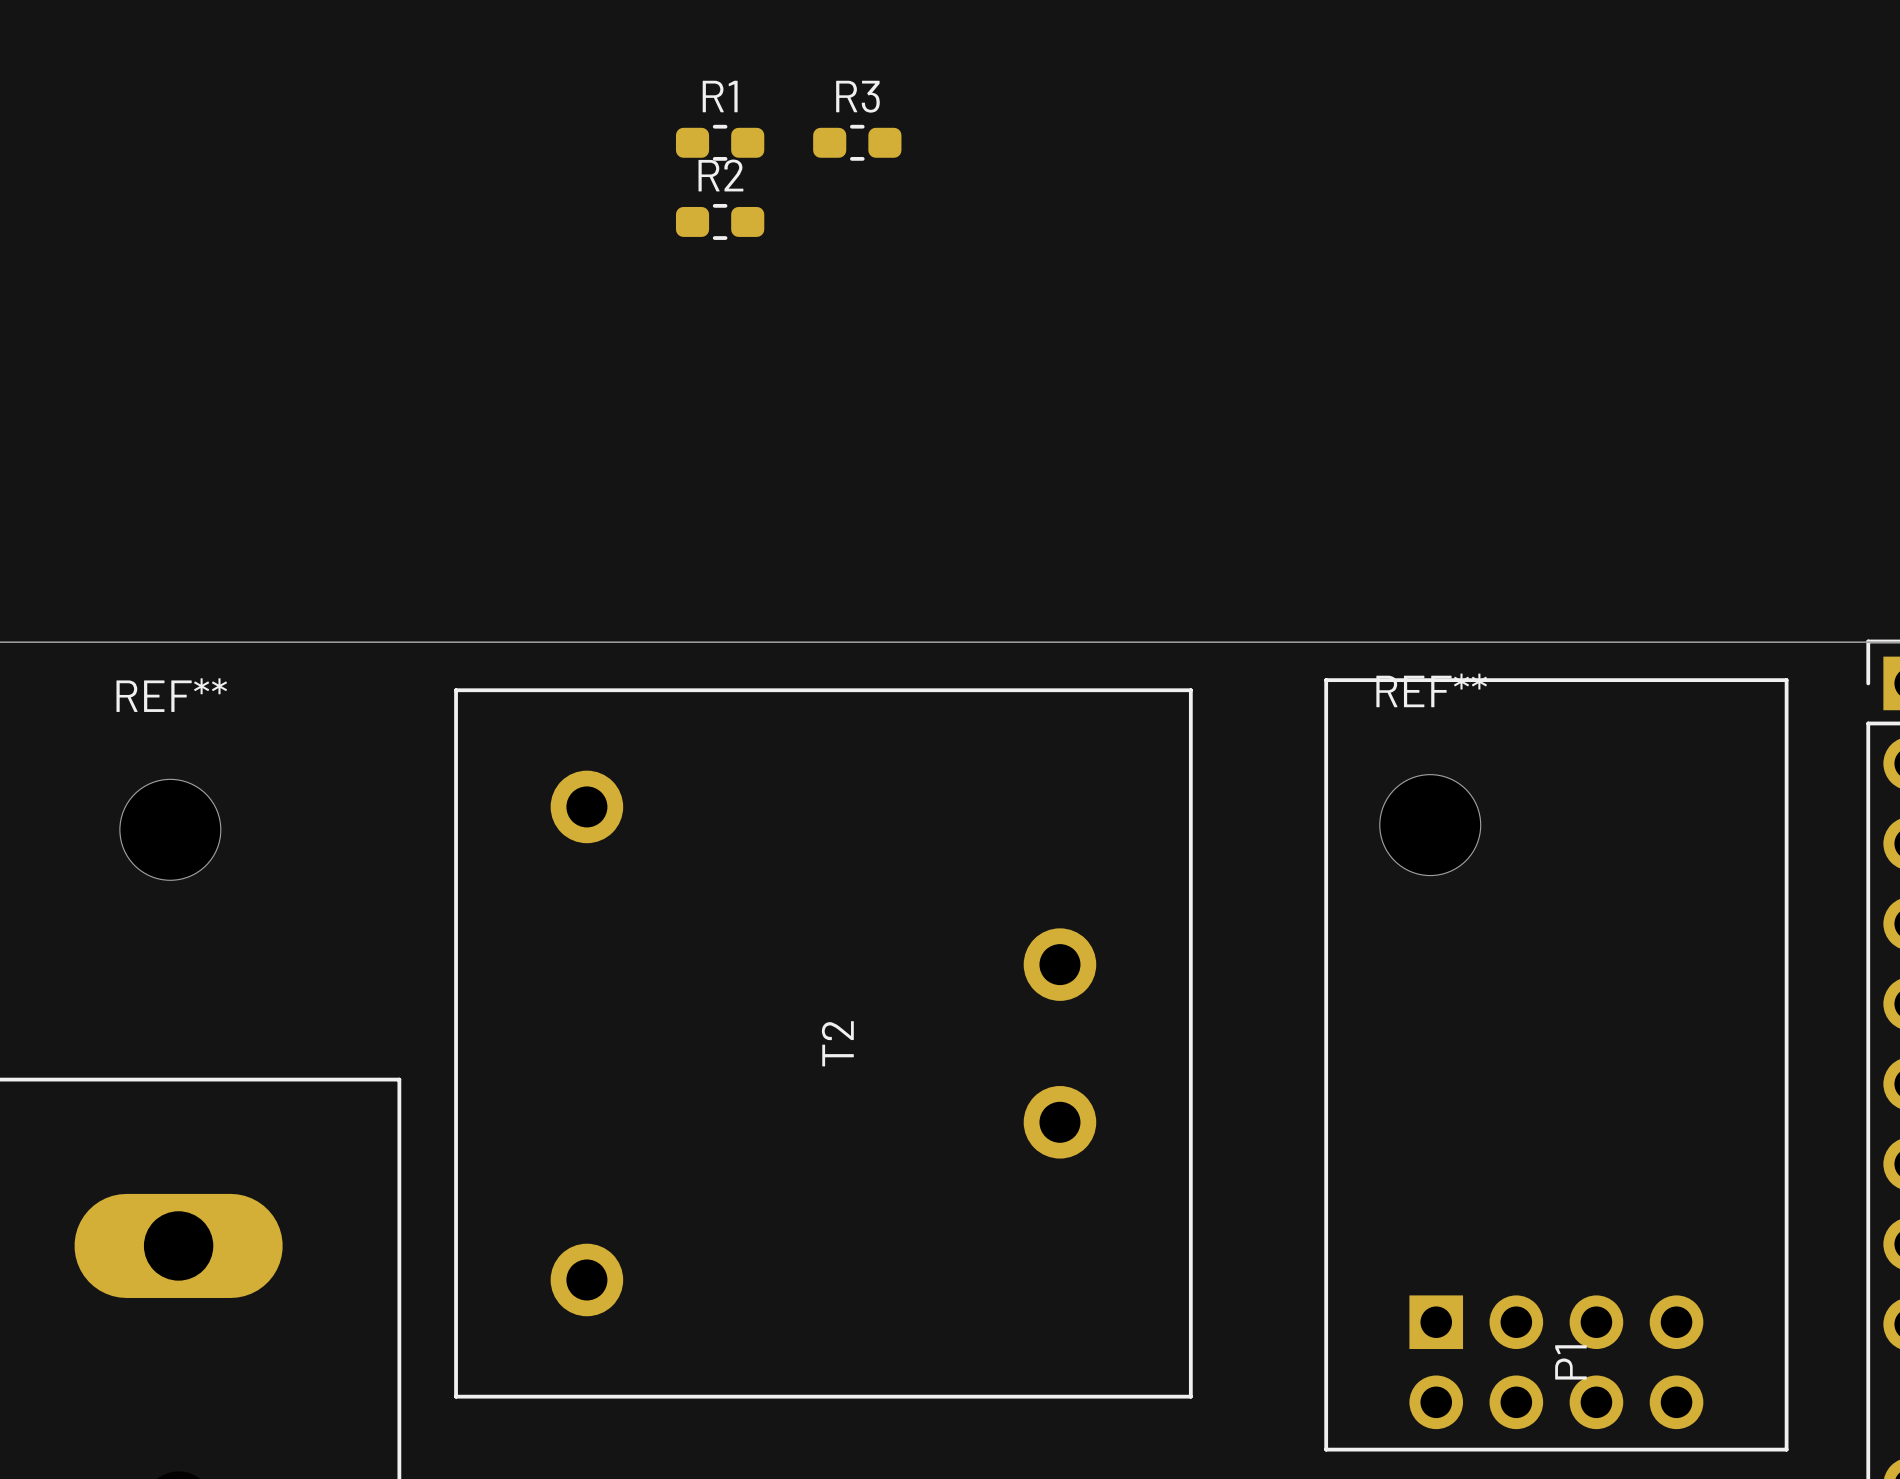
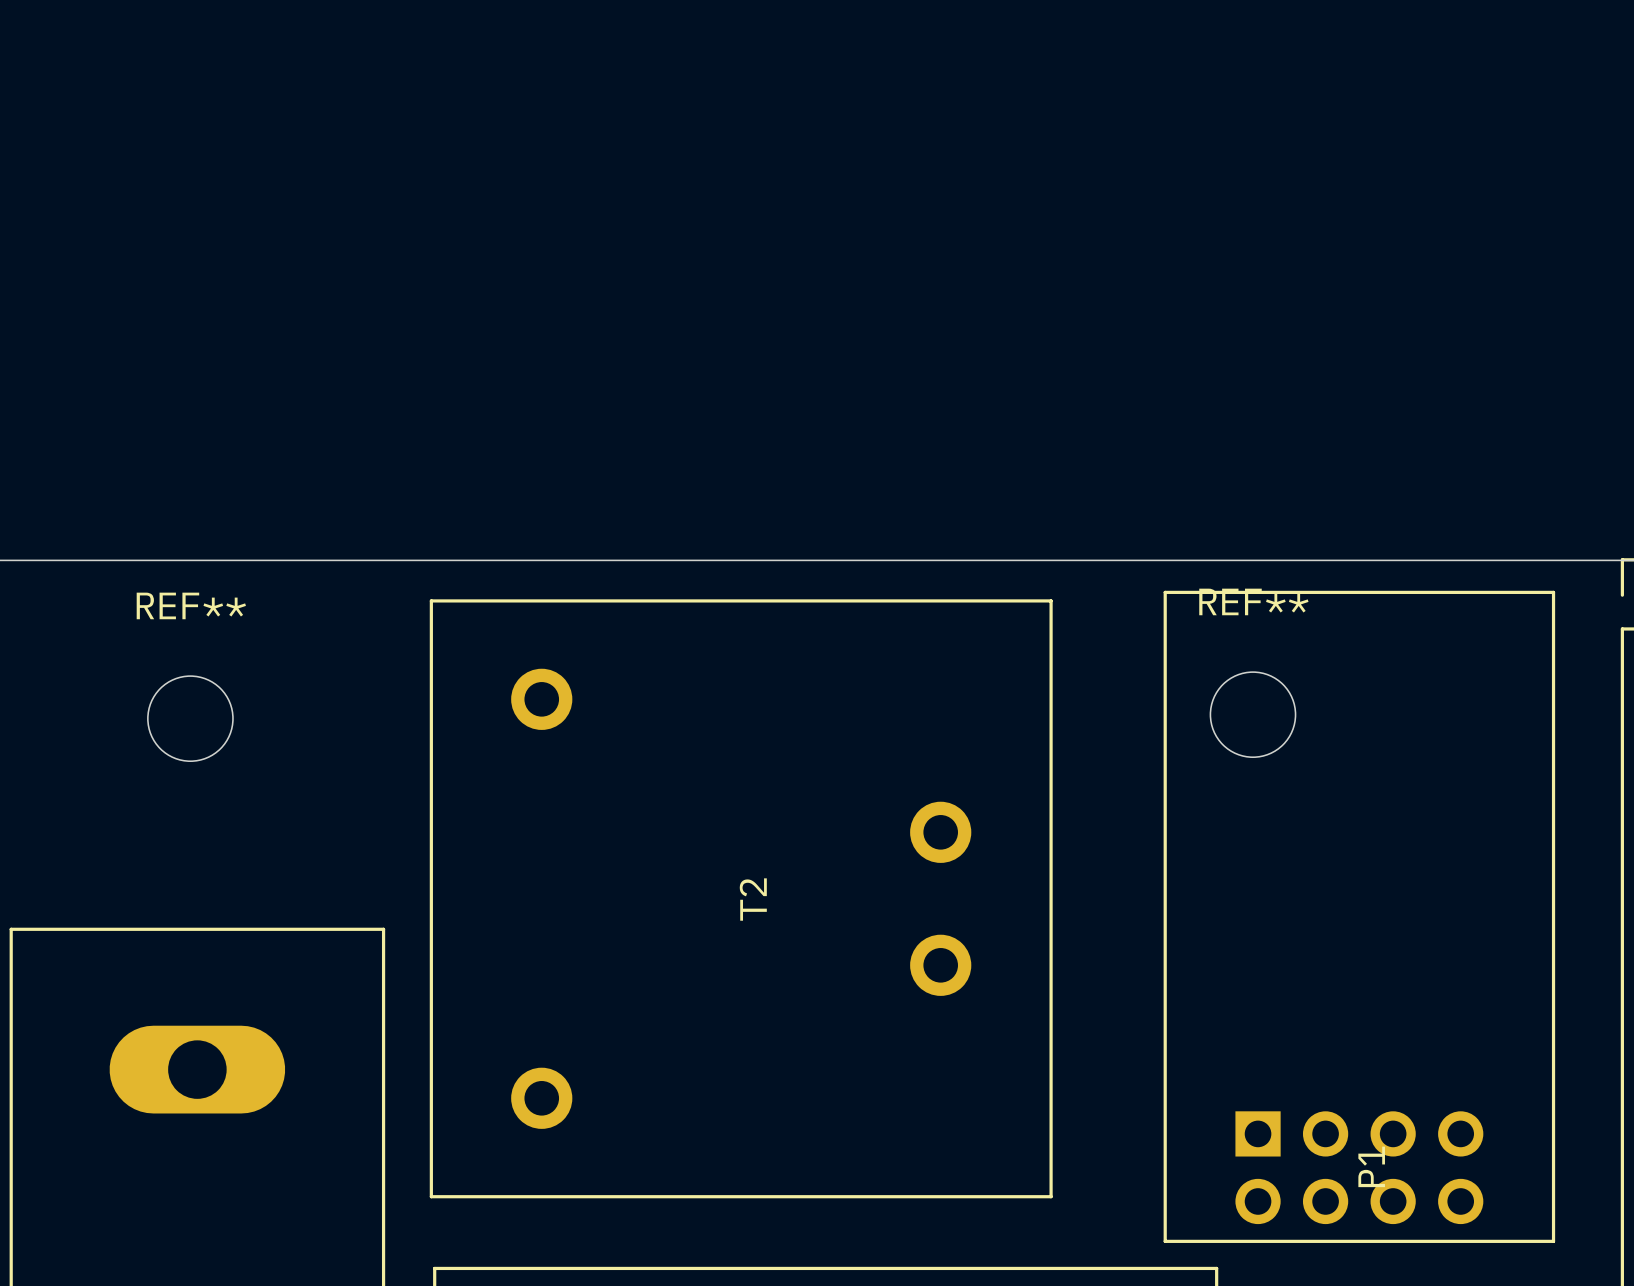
R1: (720, 142) -> none
R3: (857, 142) -> none
R2: (720, 221) -> none

